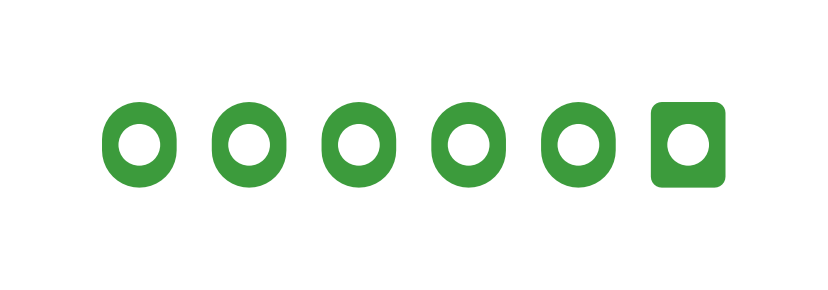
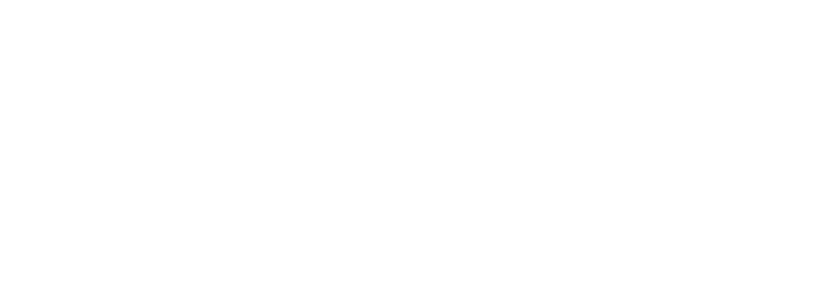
part: (413, 144) -> none

